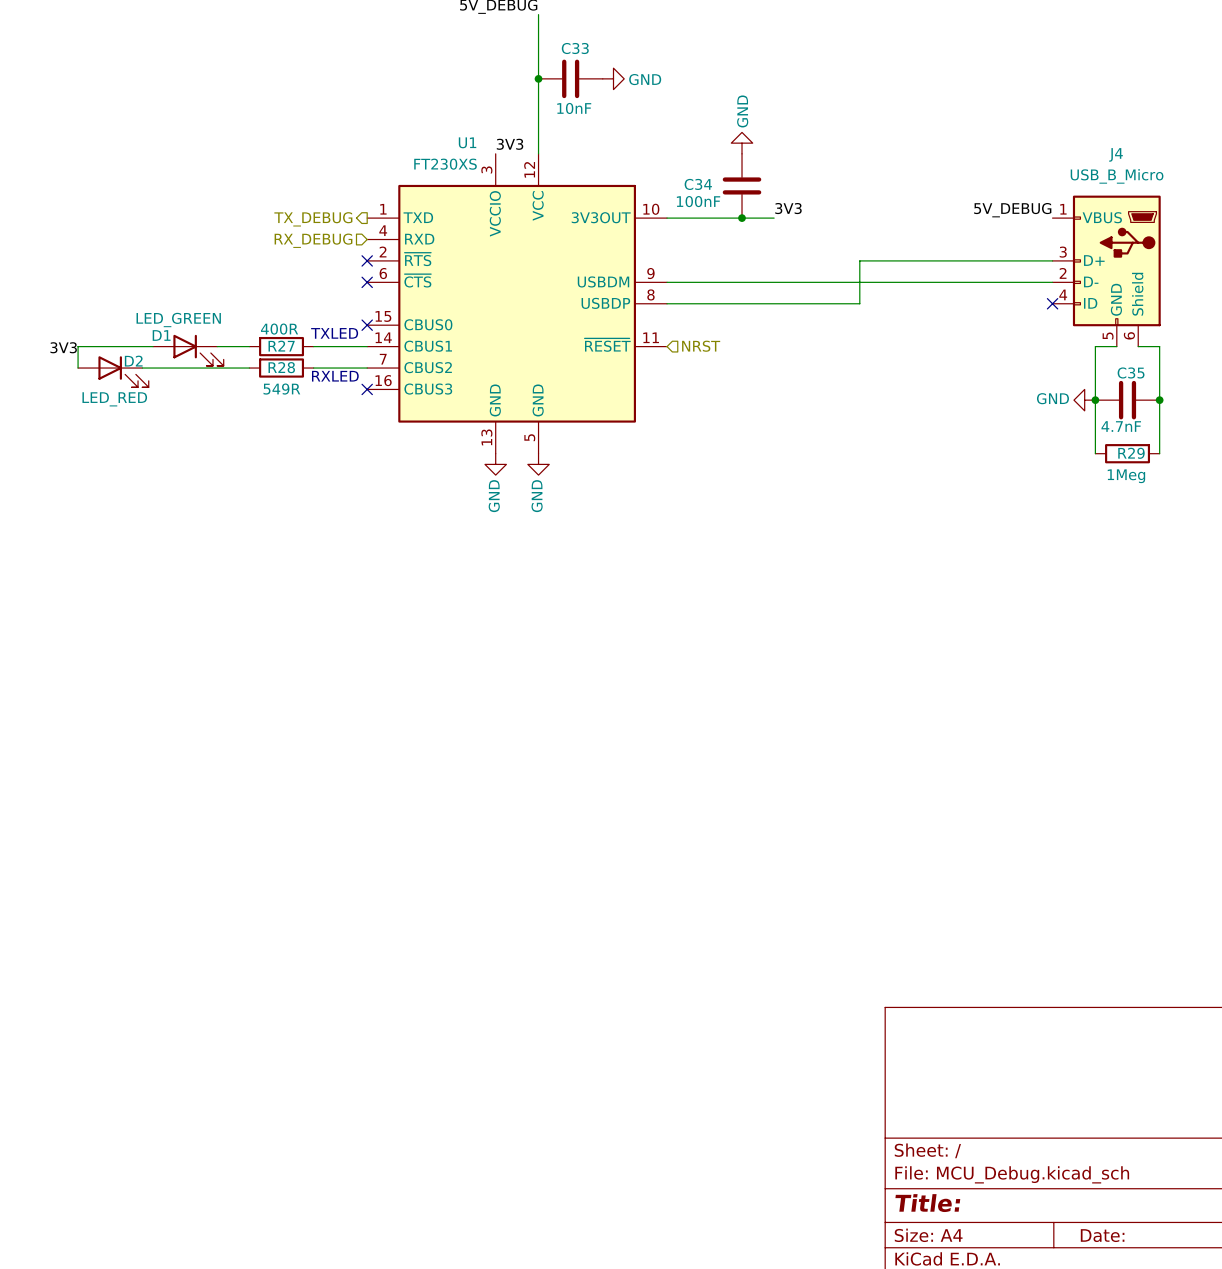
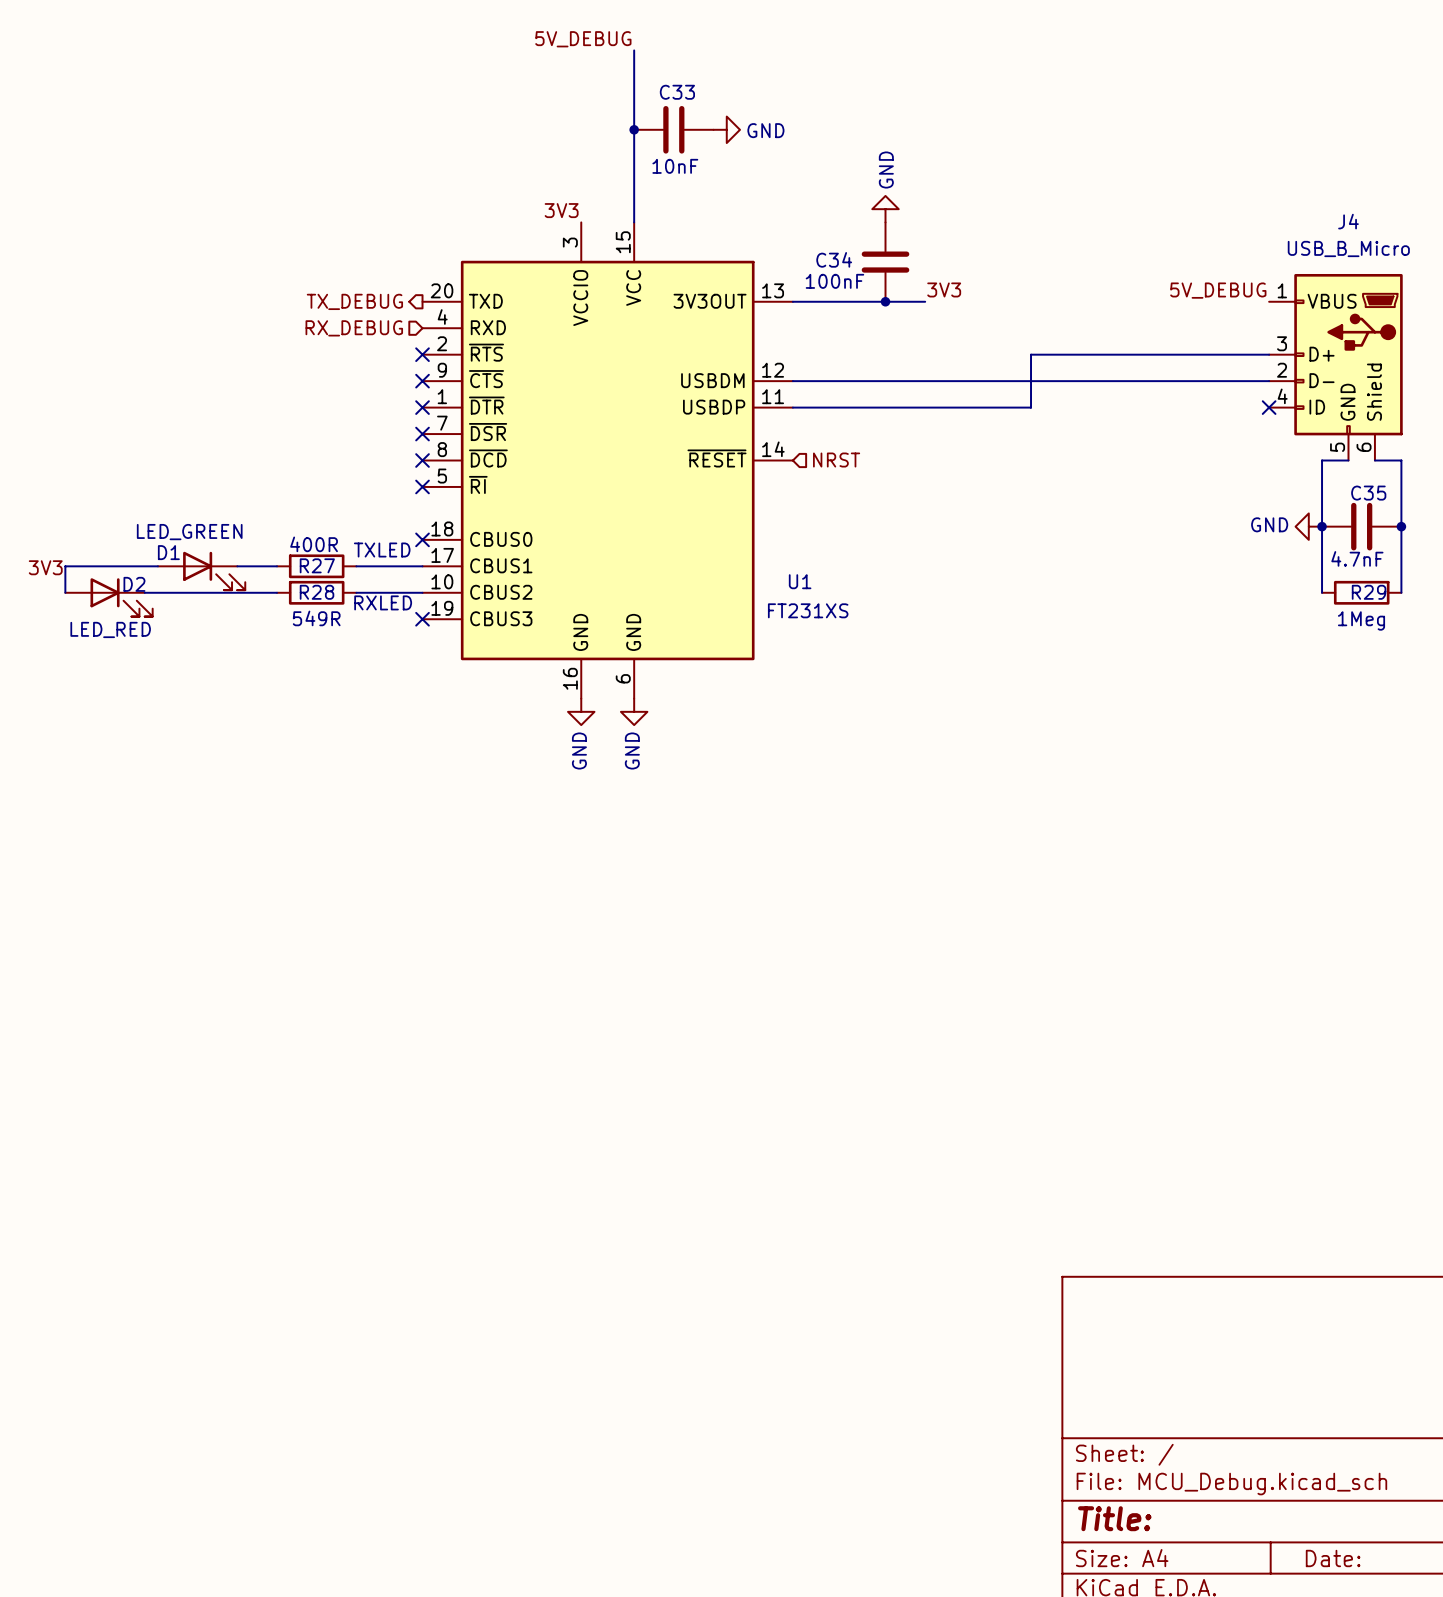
U1 name position: U1 (467, 142) -> U1 (800, 581)
label position: 3V3 (510, 144) -> 3V3 (561, 210)
U1 symbol: [367, 153, 668, 454] -> [422, 222, 793, 699]
U1 value: FT230XS (445, 164) -> FT231XS (808, 610)
no-connect mark: none -> (422, 407)
text position: TXLED (334, 333) -> TXLED (382, 550)
wire: (153, 346) (78, 346) (78, 368) -> (157, 566) (65, 566) (65, 592)
wire: (217, 346) (249, 346) -> (237, 566) (277, 566)
R27 position: (281, 346) -> (316, 566)
wire: (313, 346) (367, 346) -> (356, 566) (422, 566)
no-connect mark: none -> (422, 460)
label position: 3V3 (63, 347) -> 3V3 (45, 567)
D1 position: (188, 350) -> (201, 570)
wire: (142, 368) (249, 368) -> (144, 592) (277, 592)
R28 position: (281, 368) -> (316, 592)
wire: (313, 368) (367, 368) -> (356, 592) (422, 592)
no-connect mark: none -> (422, 486)
D2 position: (113, 371) -> (109, 597)
text position: RXLED (335, 376) -> RXLED (383, 602)
no-connect mark: (367, 389) -> none
no-connect mark: none -> (422, 539)
power symbol: GND (495, 464) -> none
power symbol: GND (538, 464) -> none
no-connect mark: none -> (422, 619)
power symbol: none -> GND (581, 711)
power symbol: none -> GND (634, 711)

